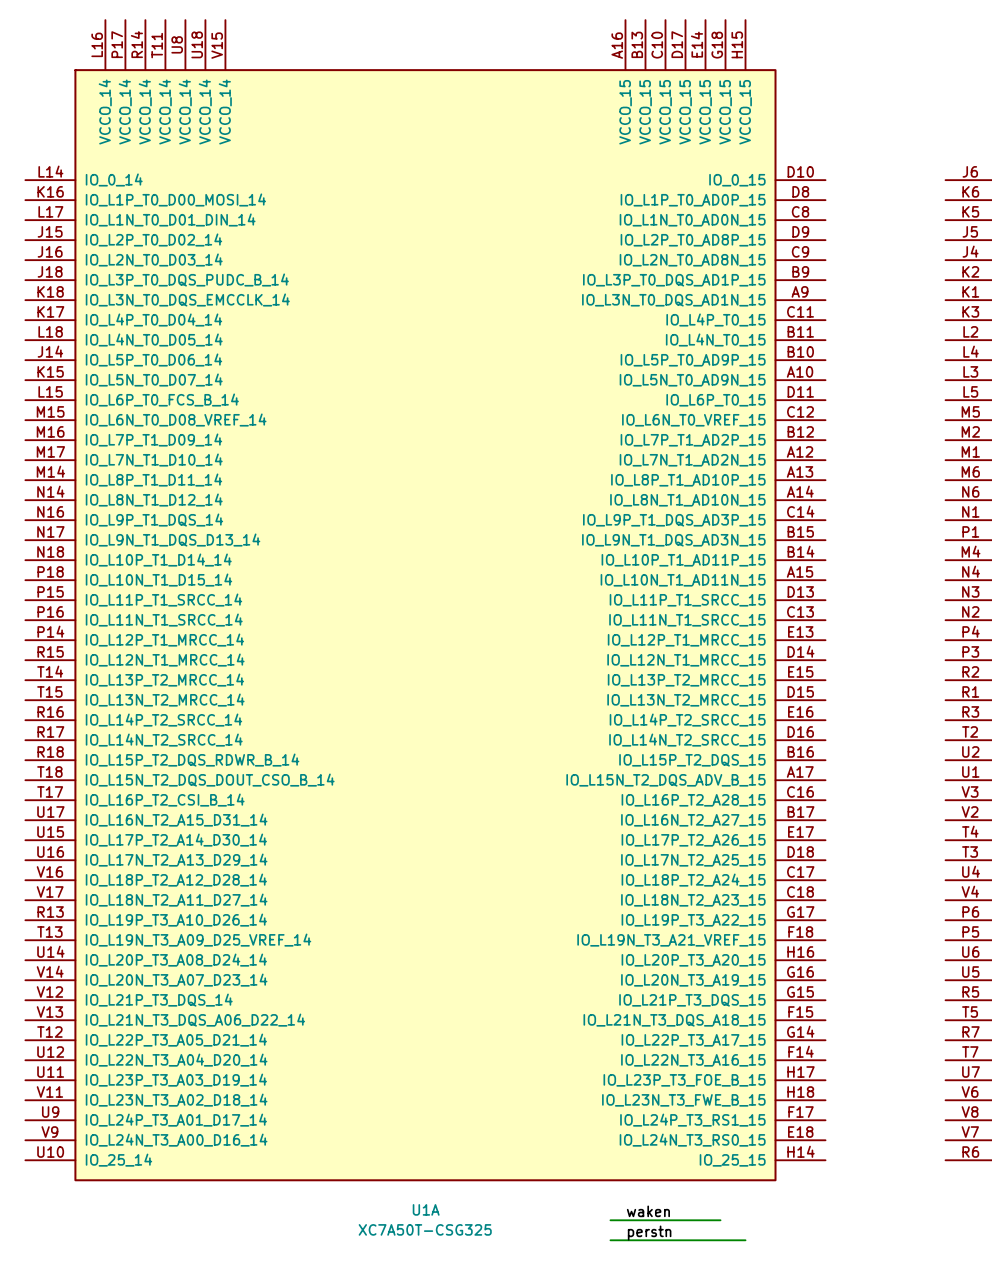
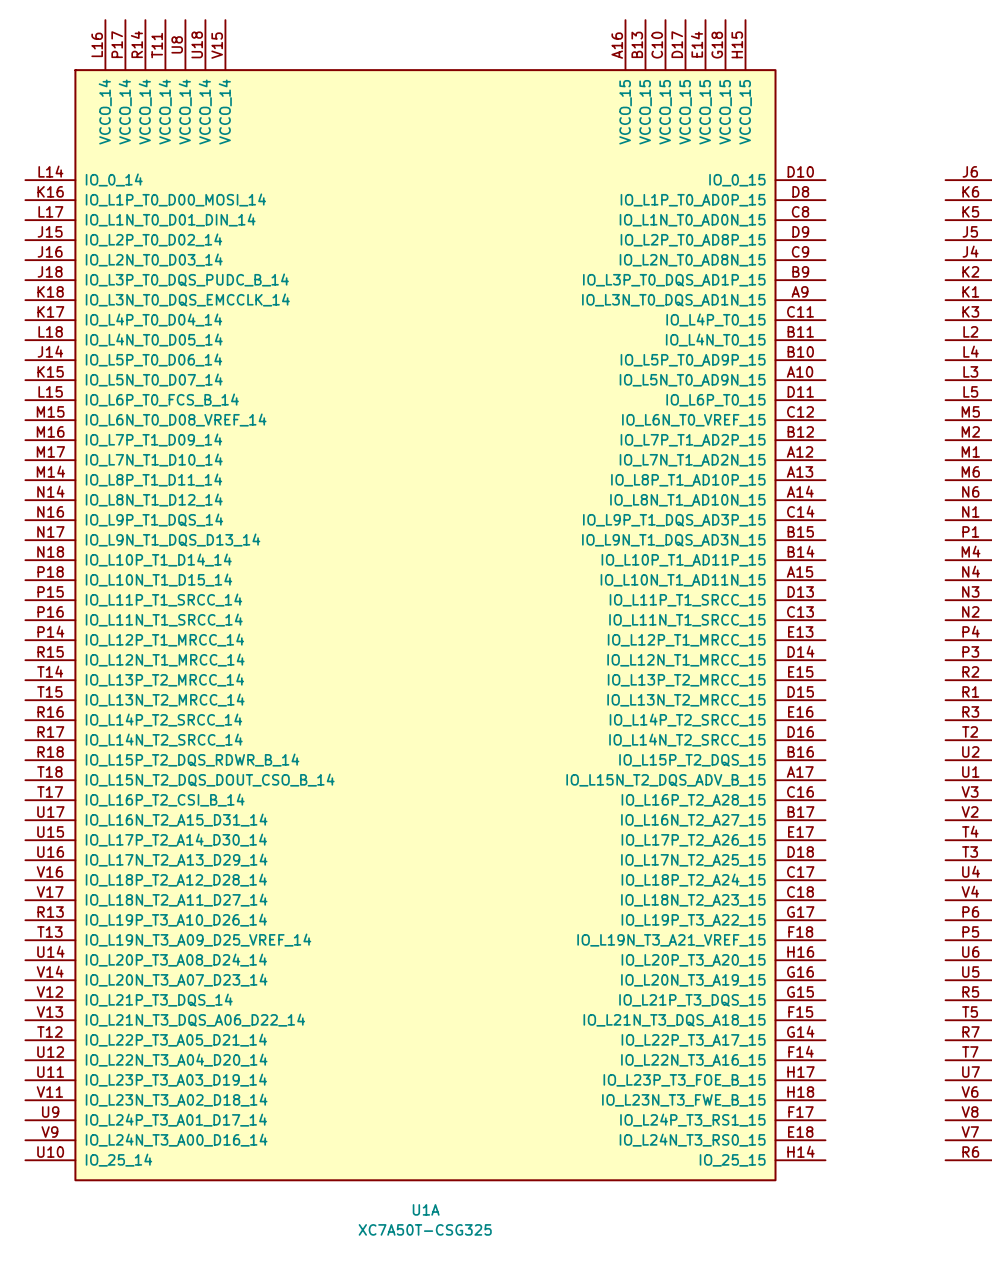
label: waken (648, 1211) -> none
wire: (610, 1220) (720, 1220) -> none
label: perstn (649, 1233) -> none
wire: (610, 1240) (745, 1240) -> none

